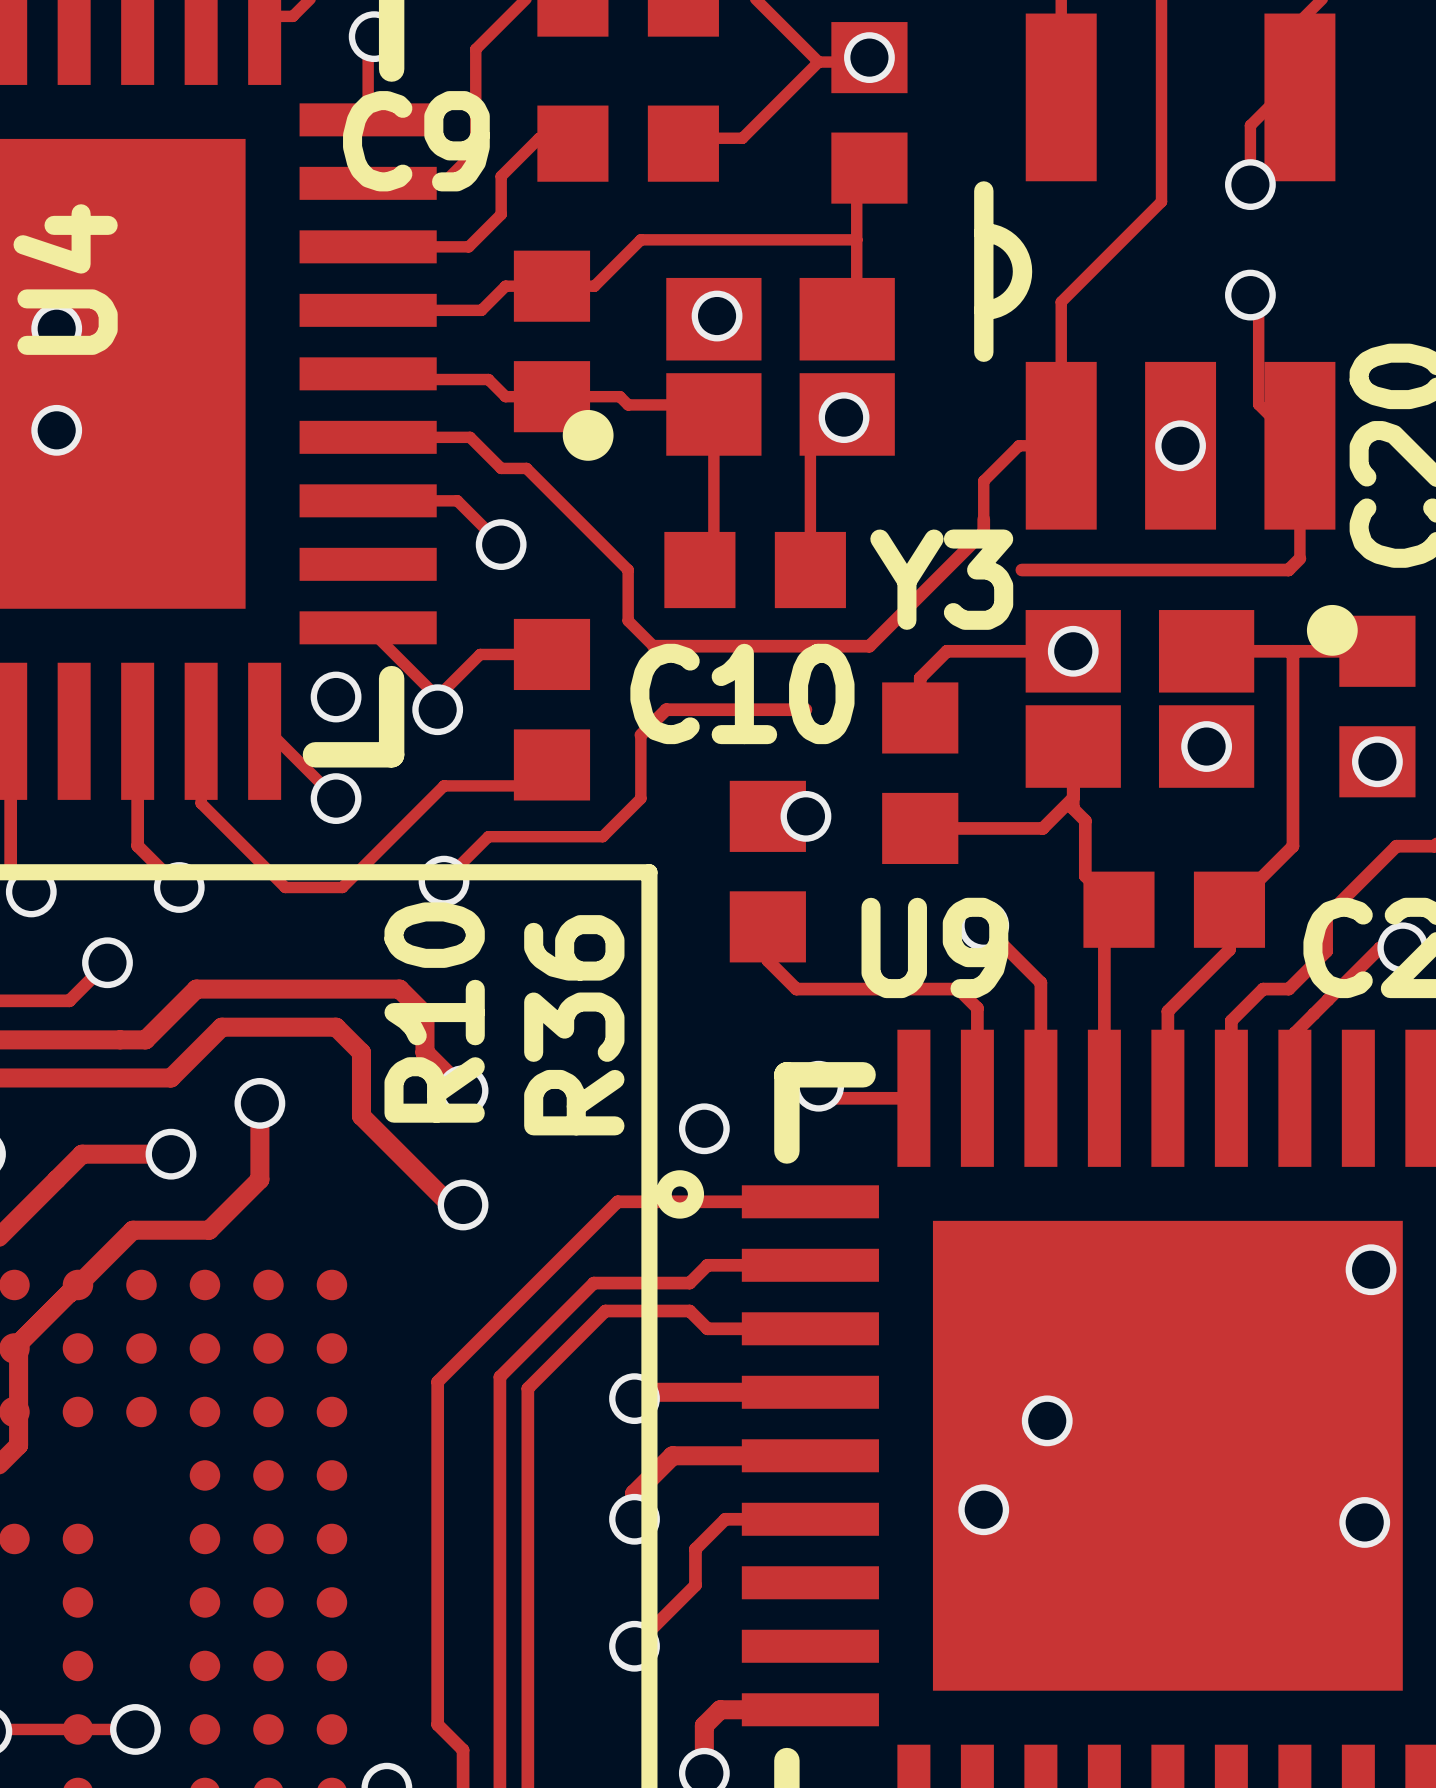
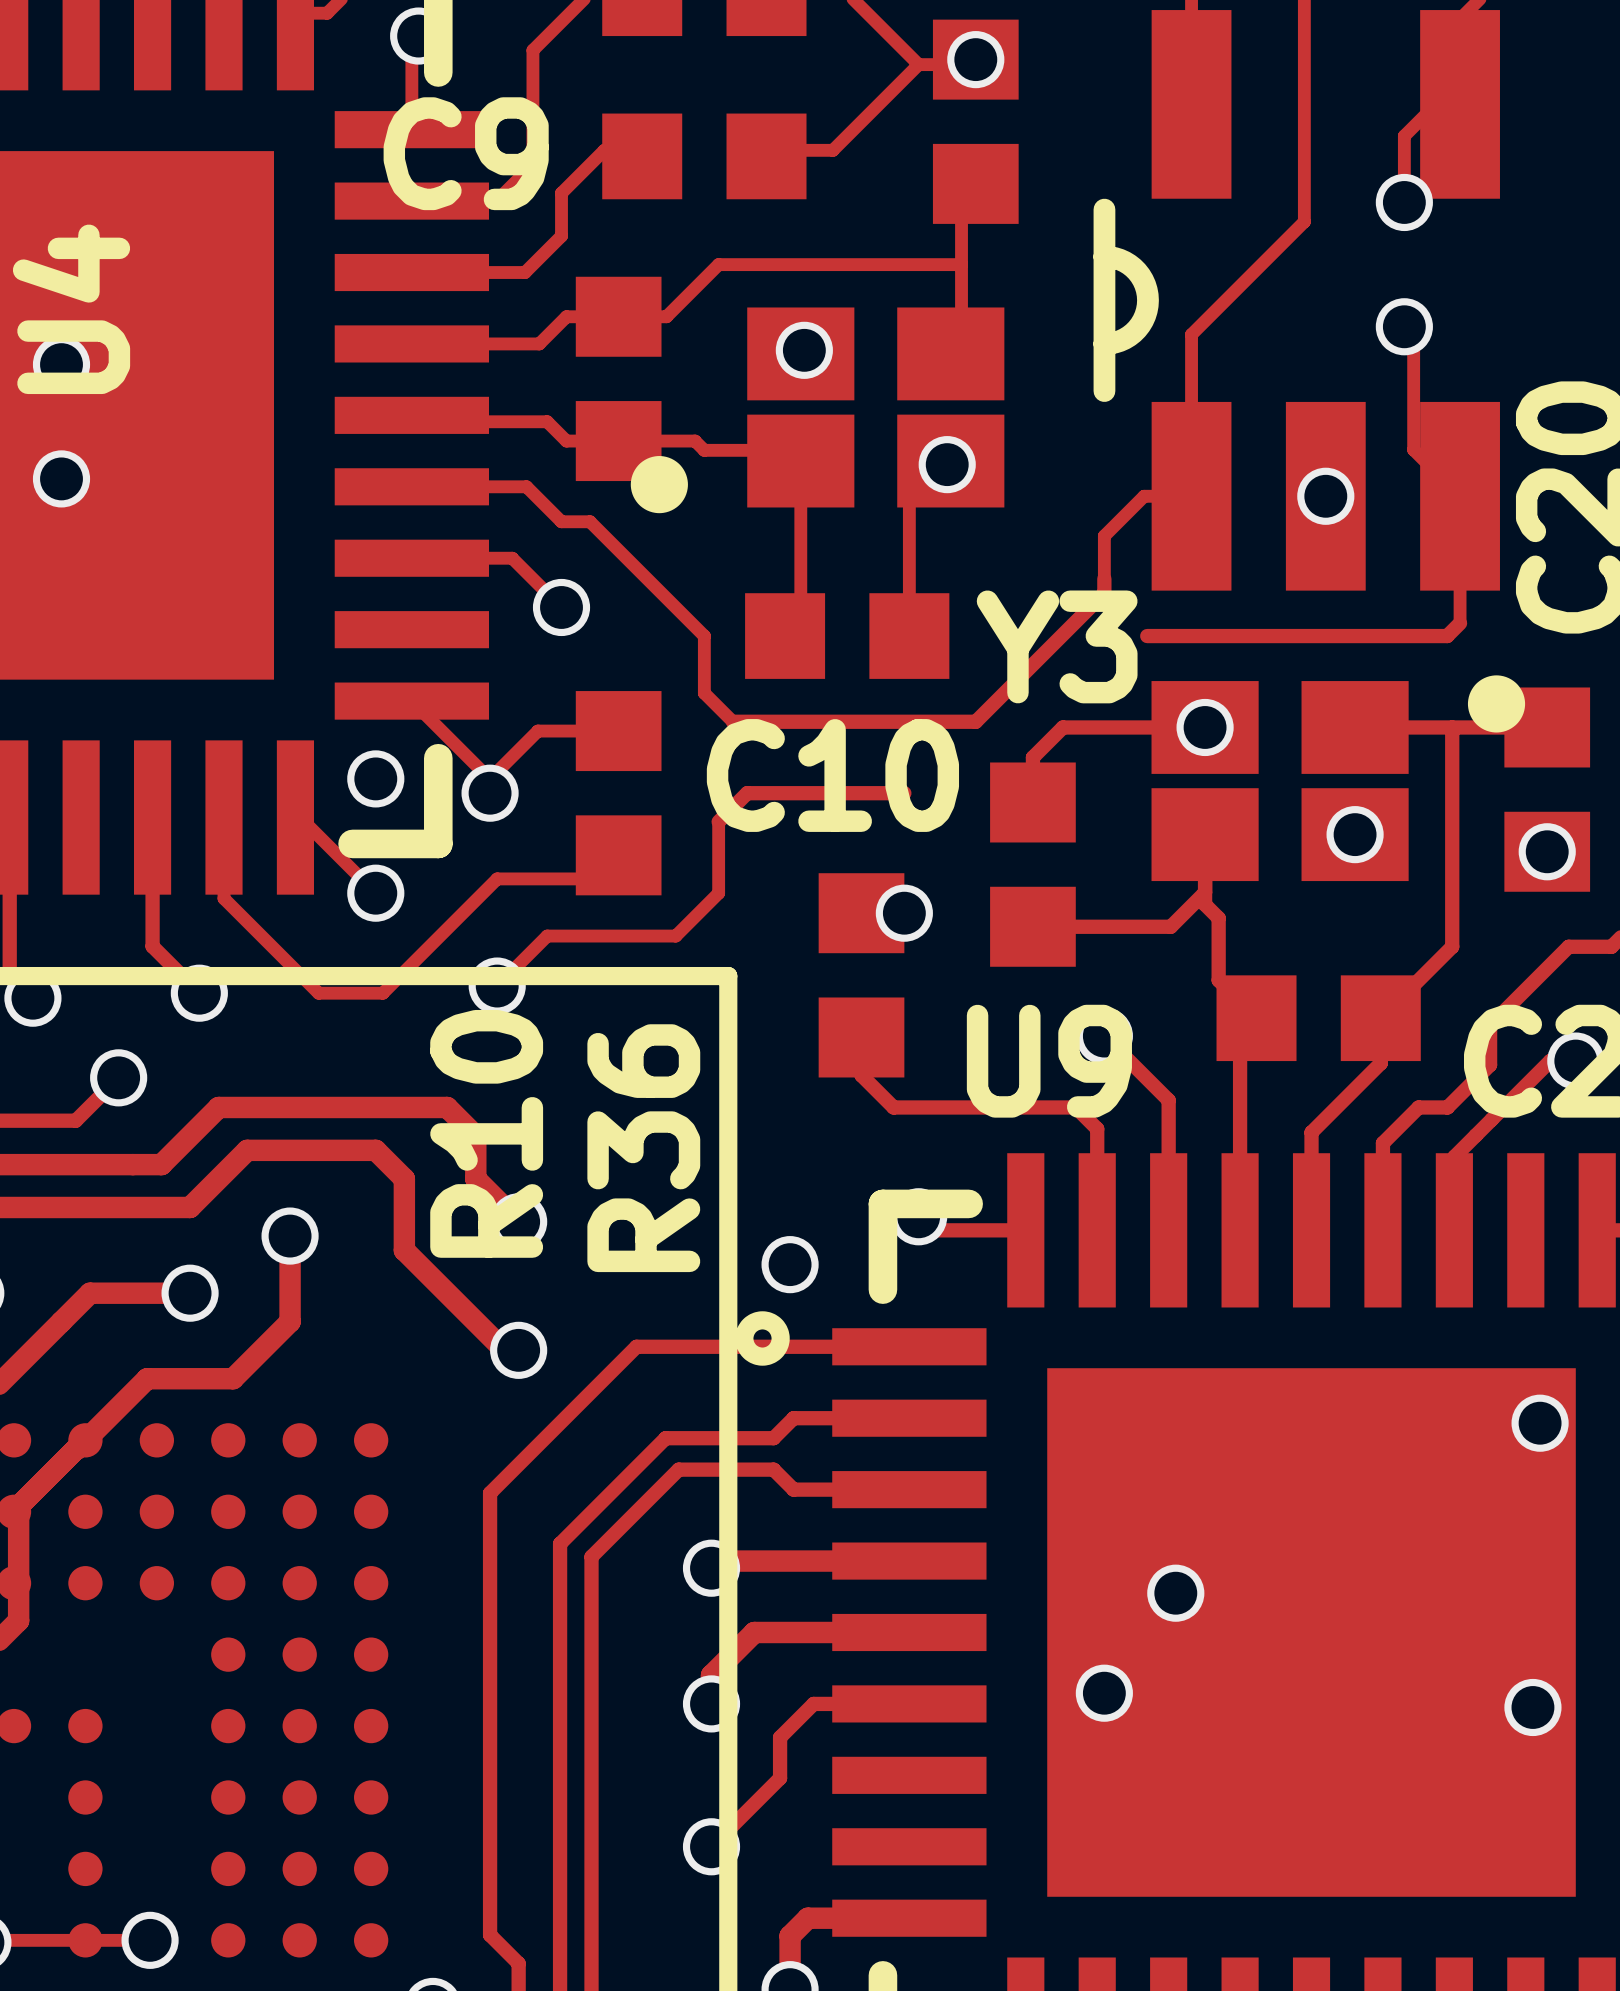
track: (617, 1201) (437, 1381) -> (692, 1346) (636, 1346) (490, 1493) (490, 1549)

